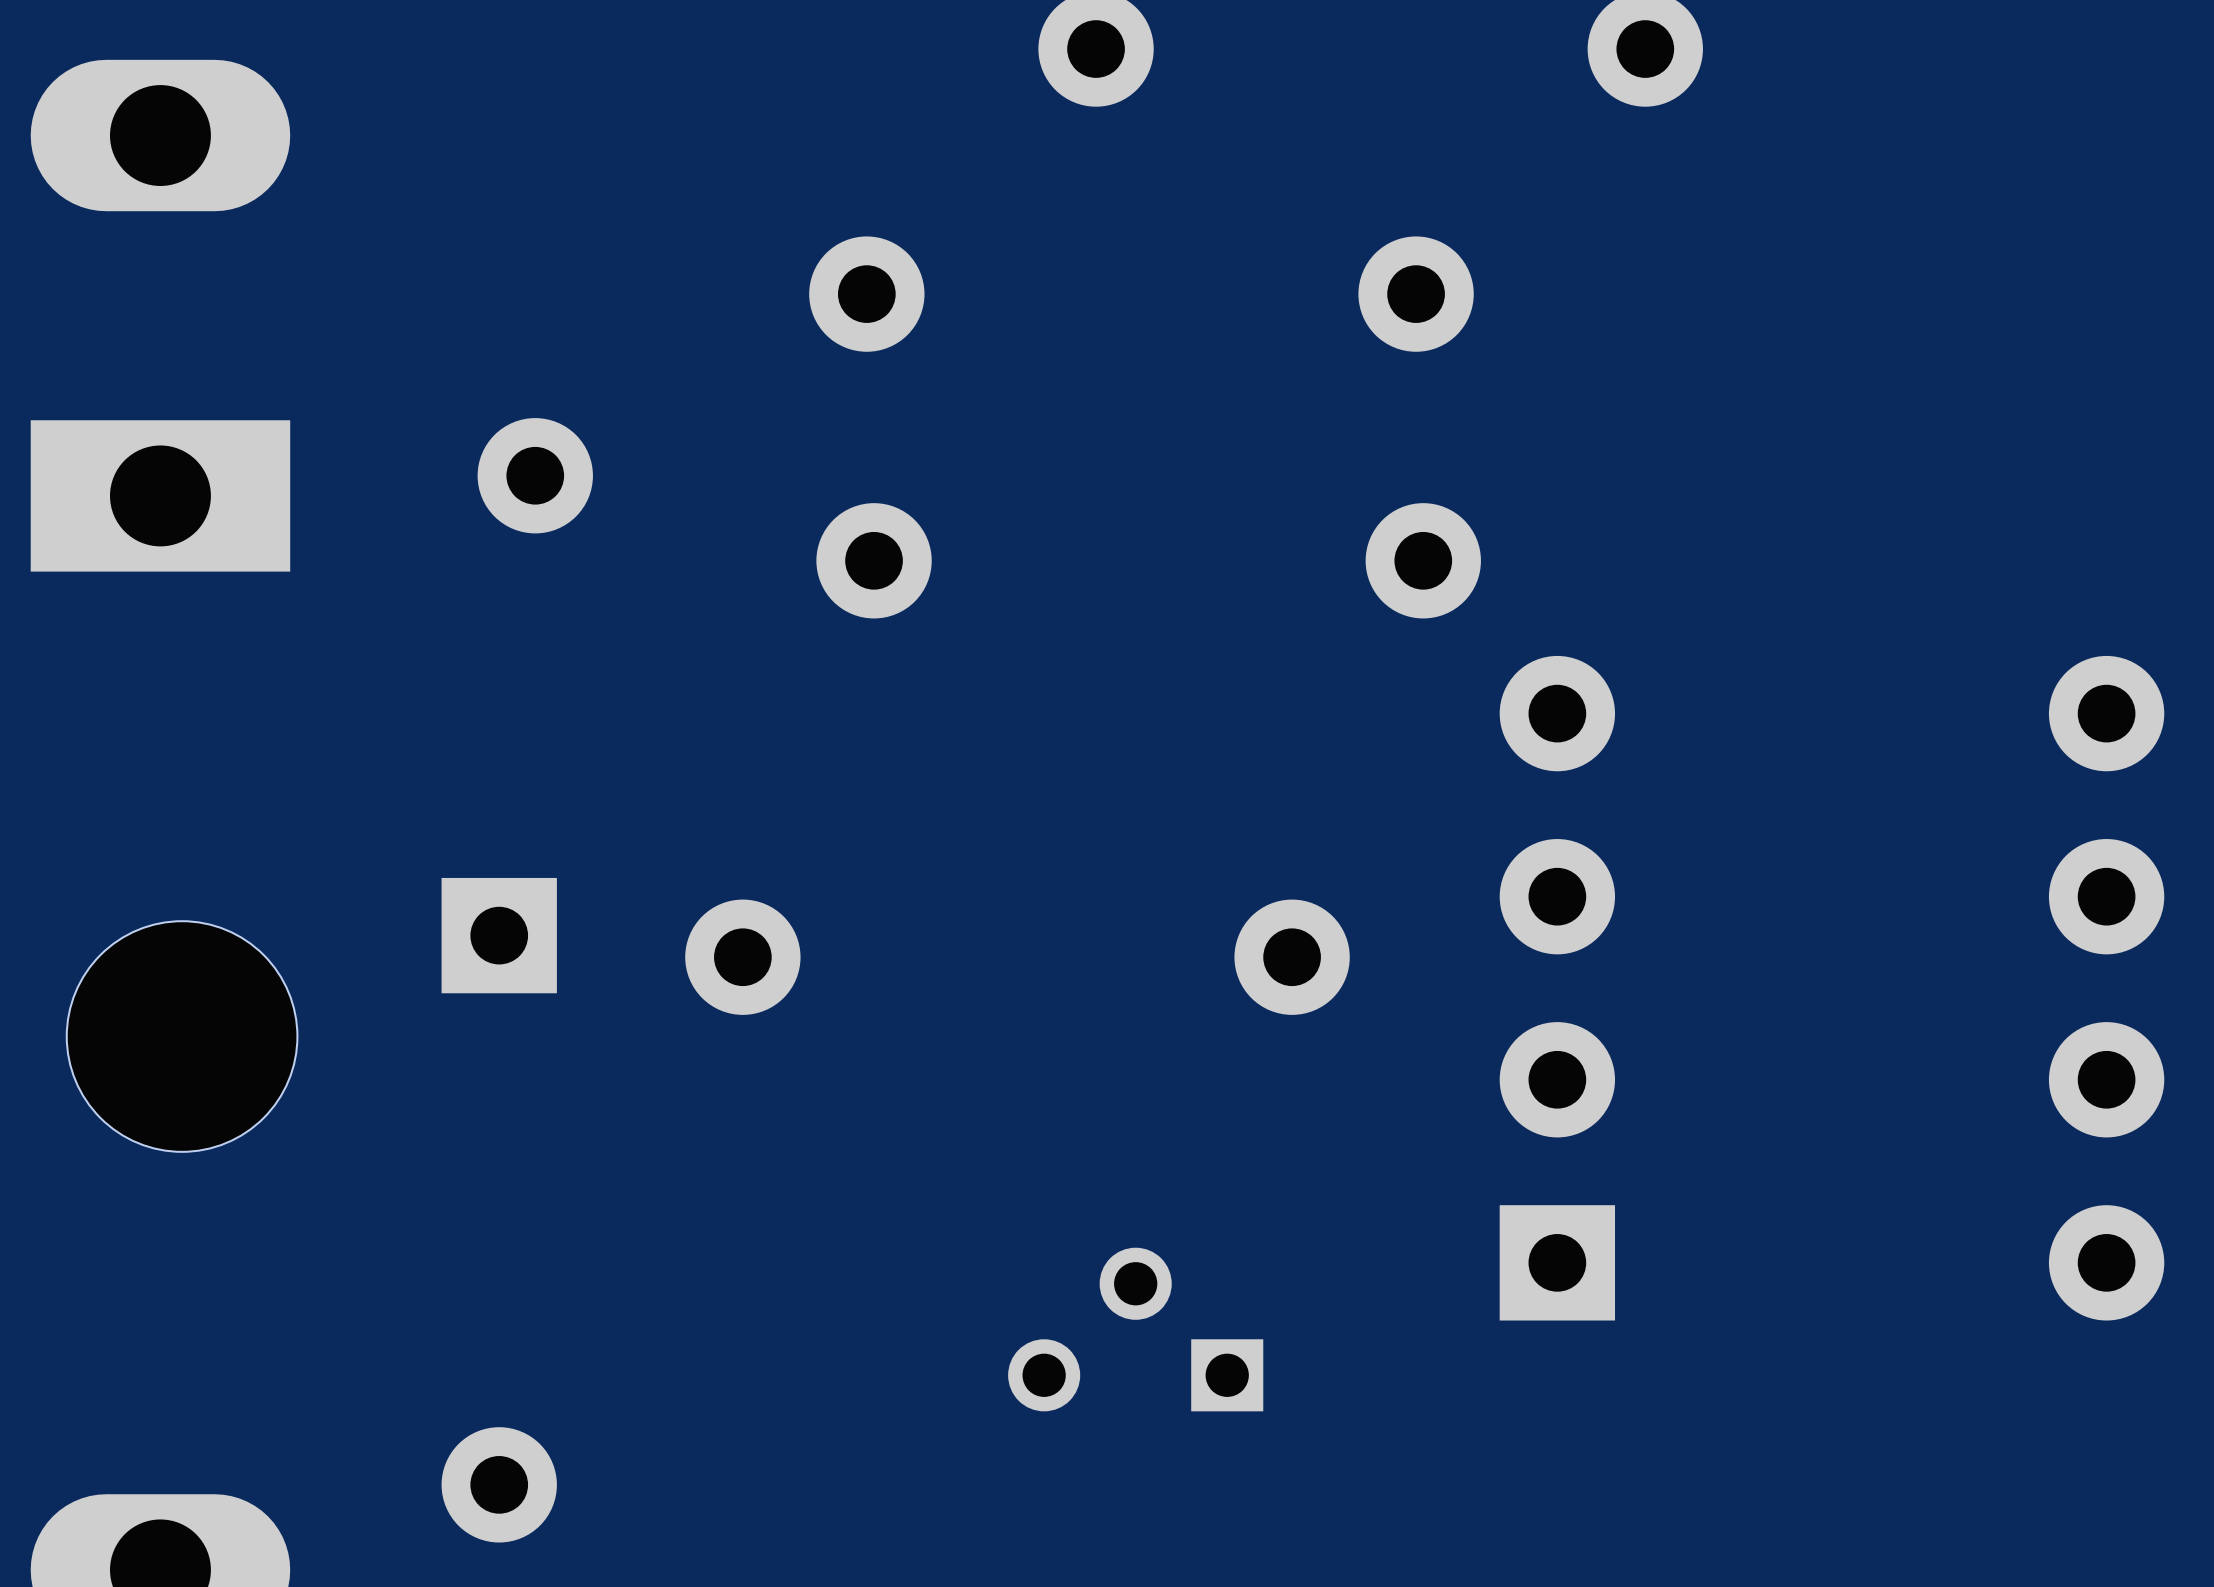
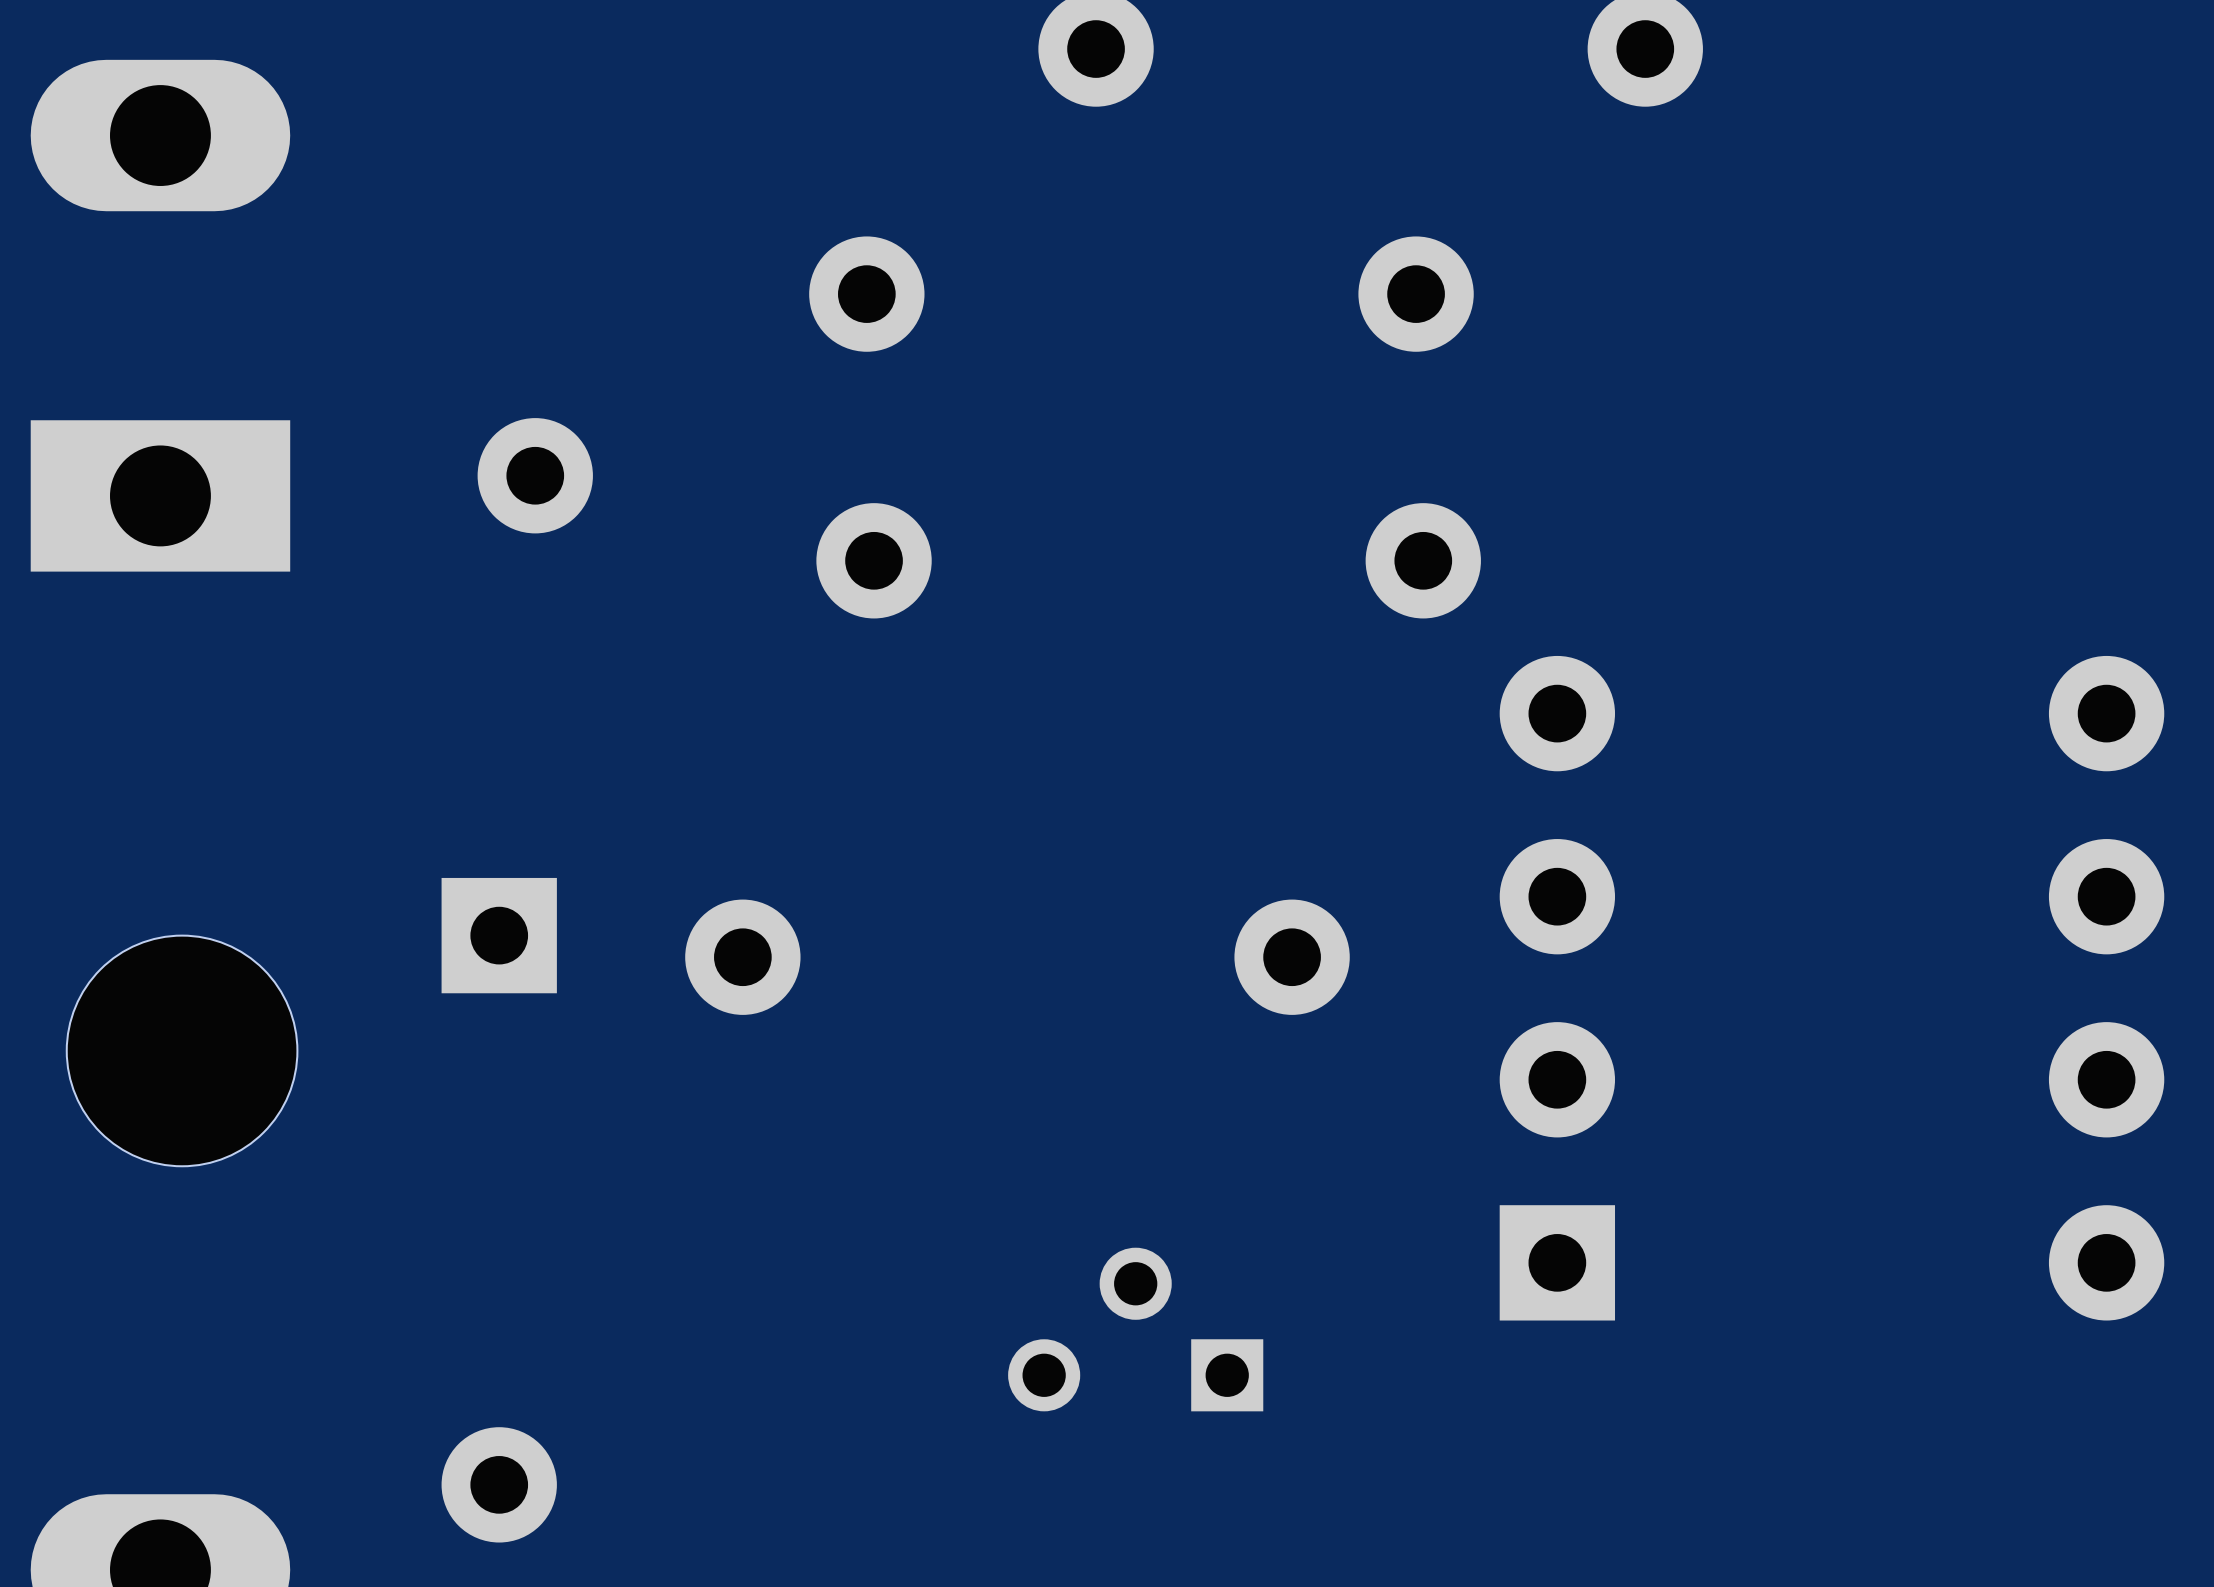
part position: (182, 1036) -> (182, 1050)

